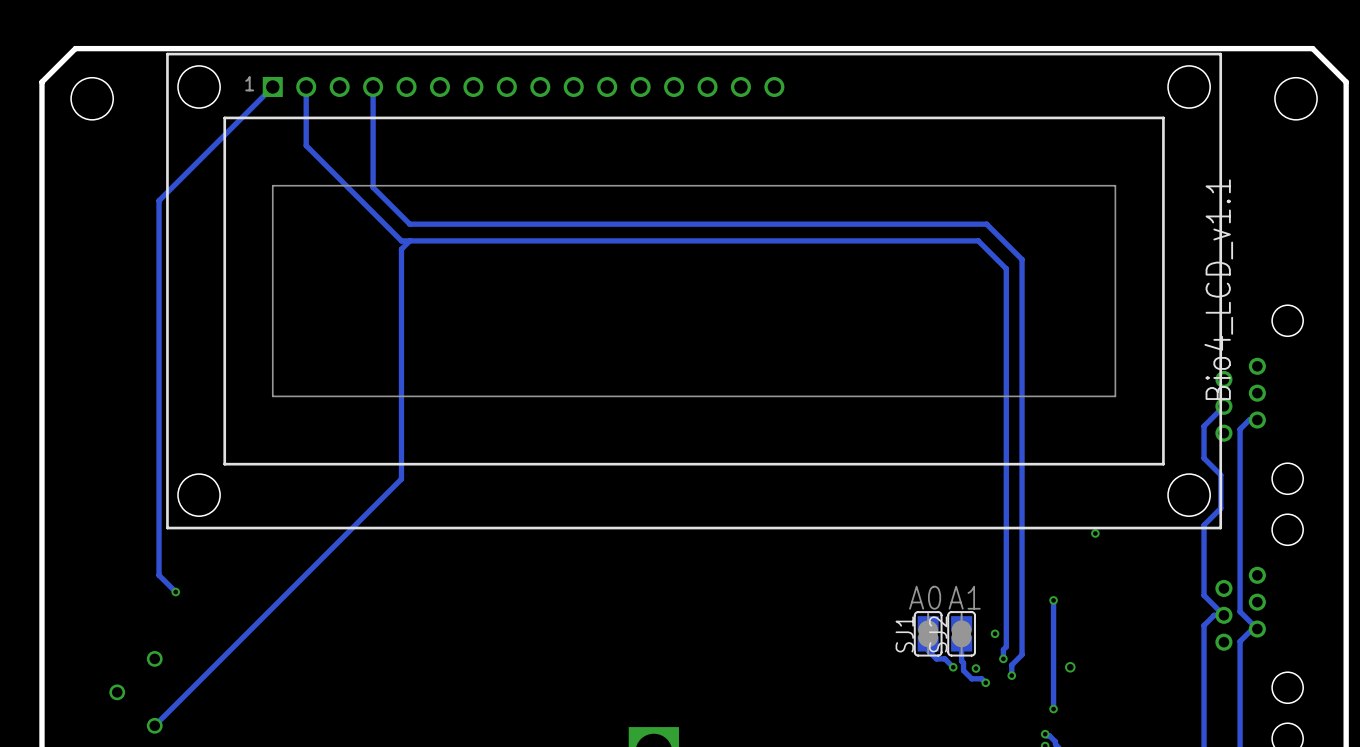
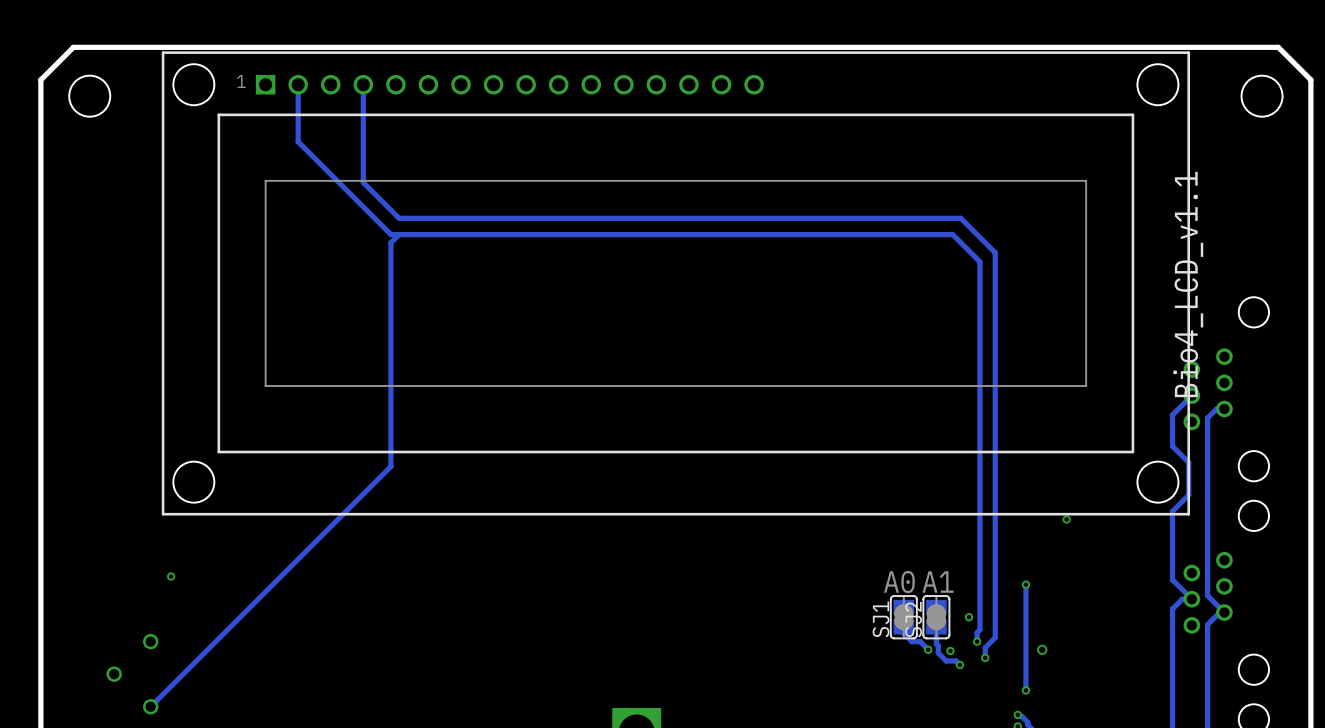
track: (272, 86) (159, 200) (159, 575) (175, 592) -> none

